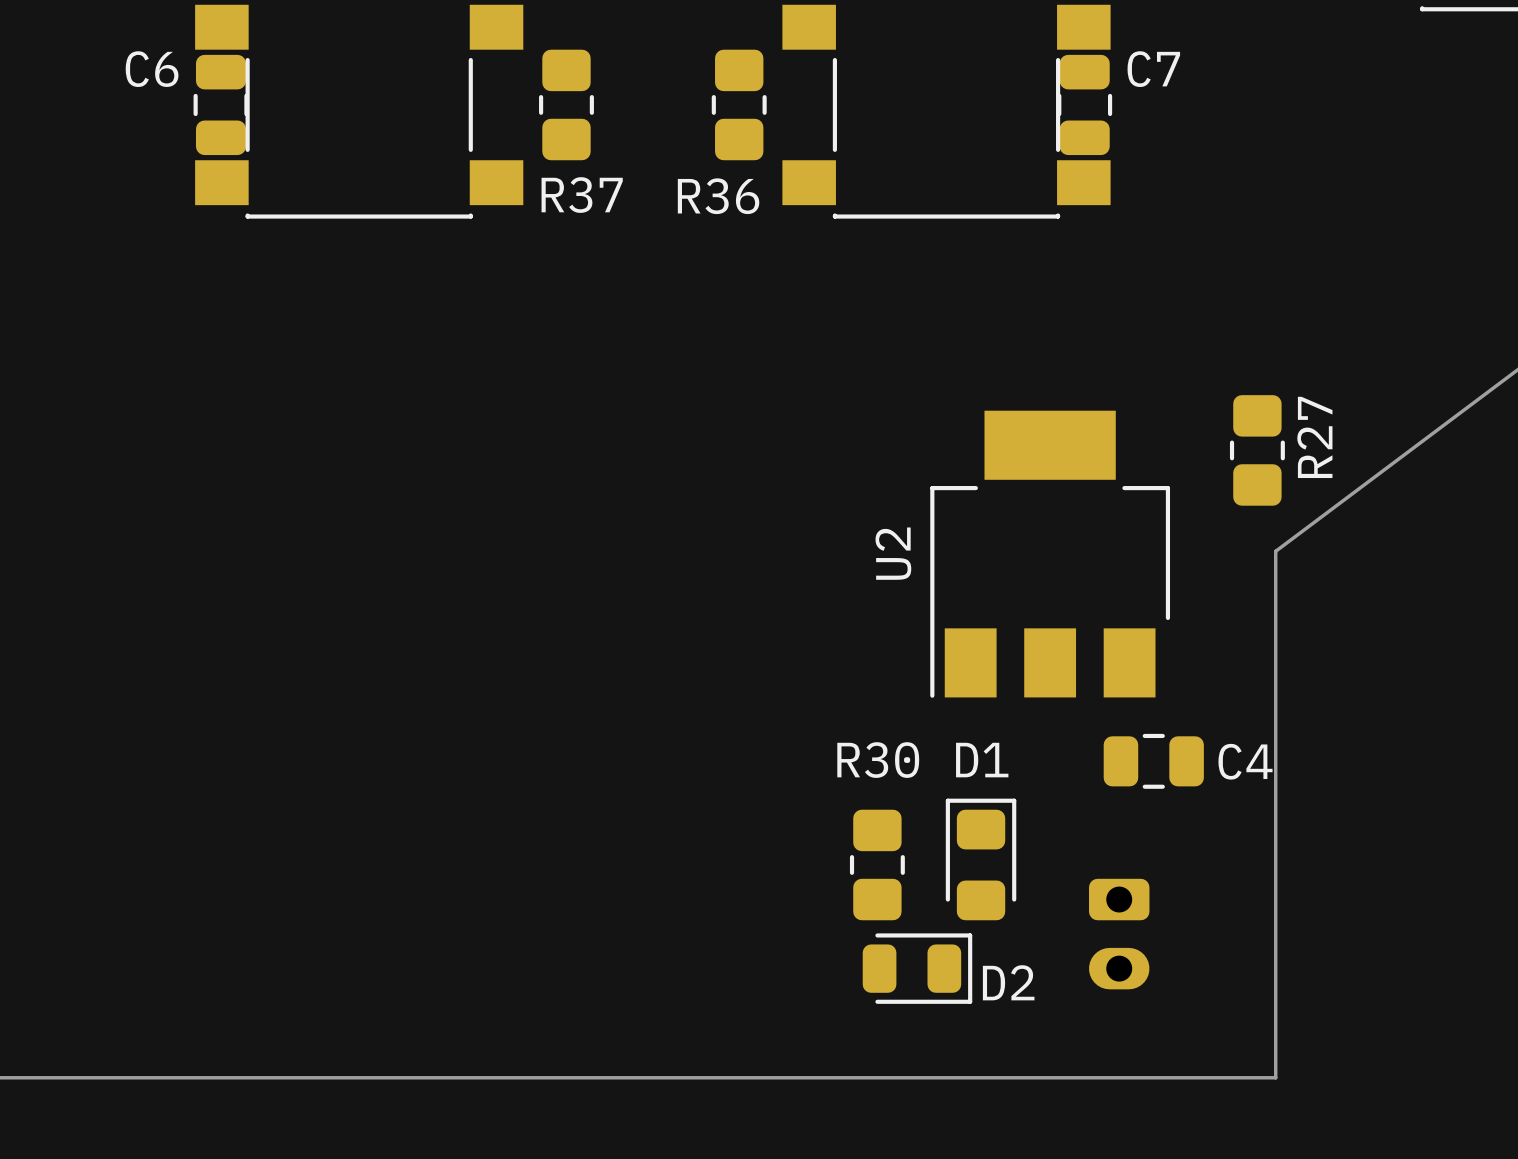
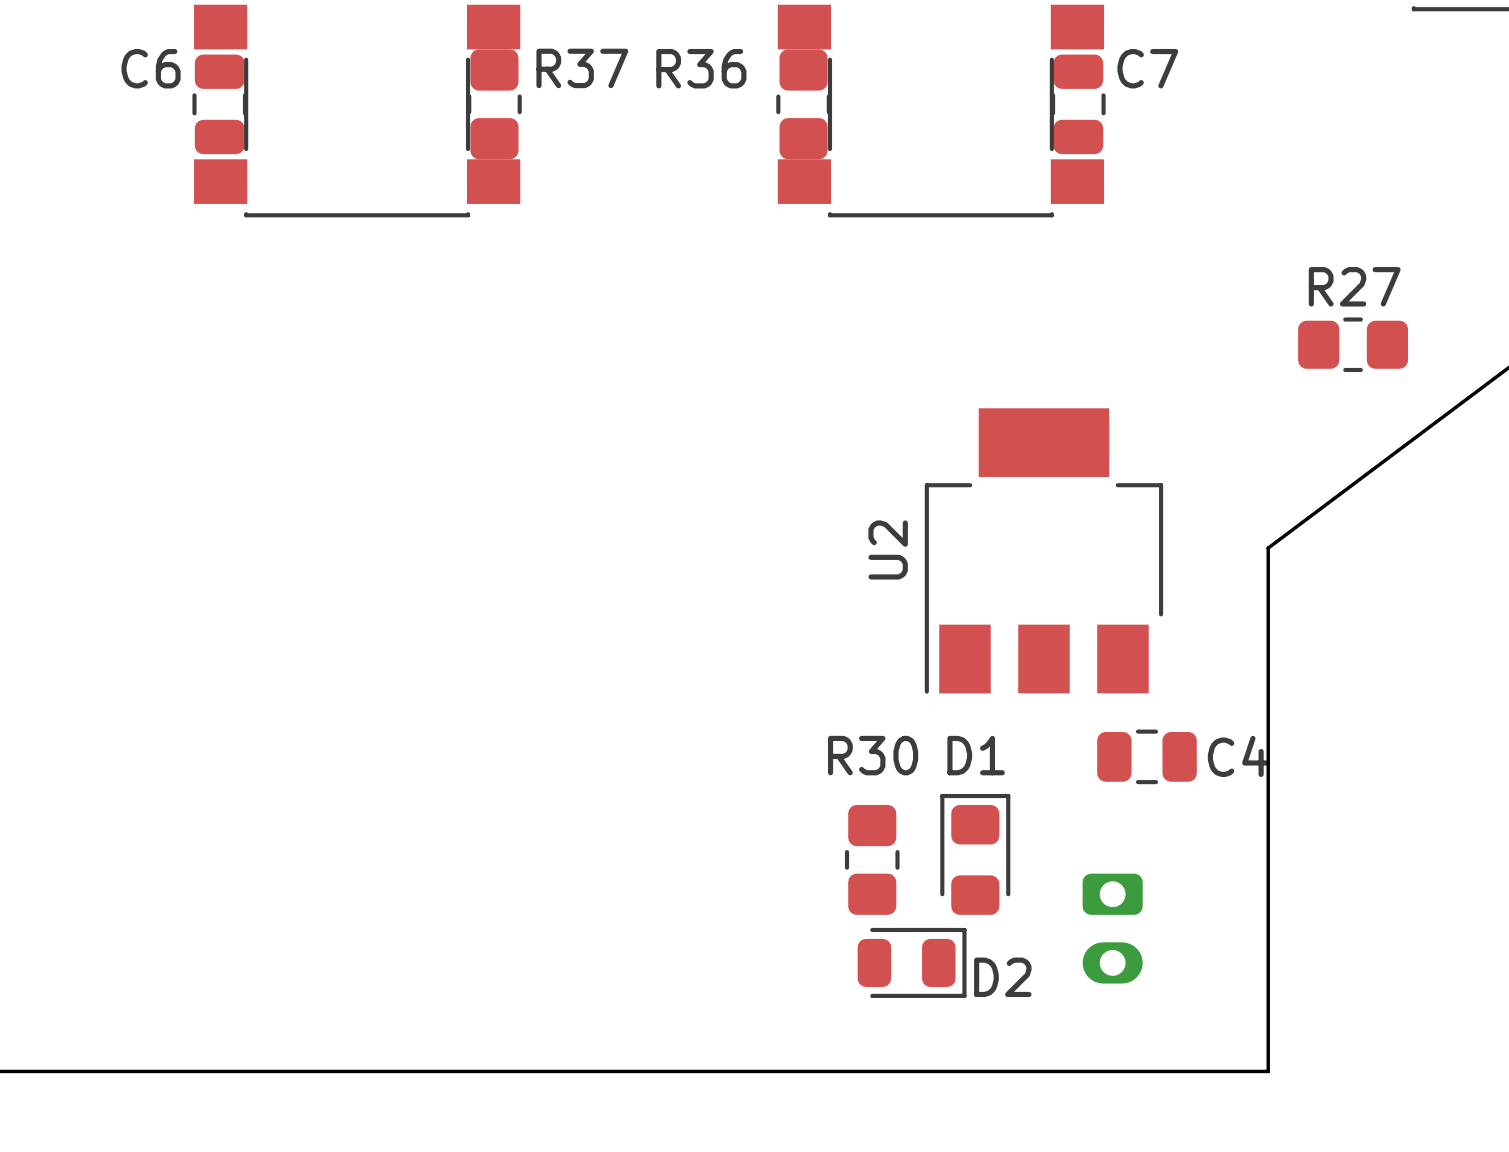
R37 position: (566, 104) -> (494, 104)
R36 position: (739, 104) -> (803, 104)
R37 name position: R37 (582, 195) -> R37 (582, 68)
R36 name position: R36 (718, 196) -> R36 (701, 68)
R27 name position: R27 (1314, 437) -> R27 (1354, 286)
R27 rotation: 0° (1257, 450) -> 90° clockwise (1353, 344)
R27 position: (1257, 450) -> (1353, 344)

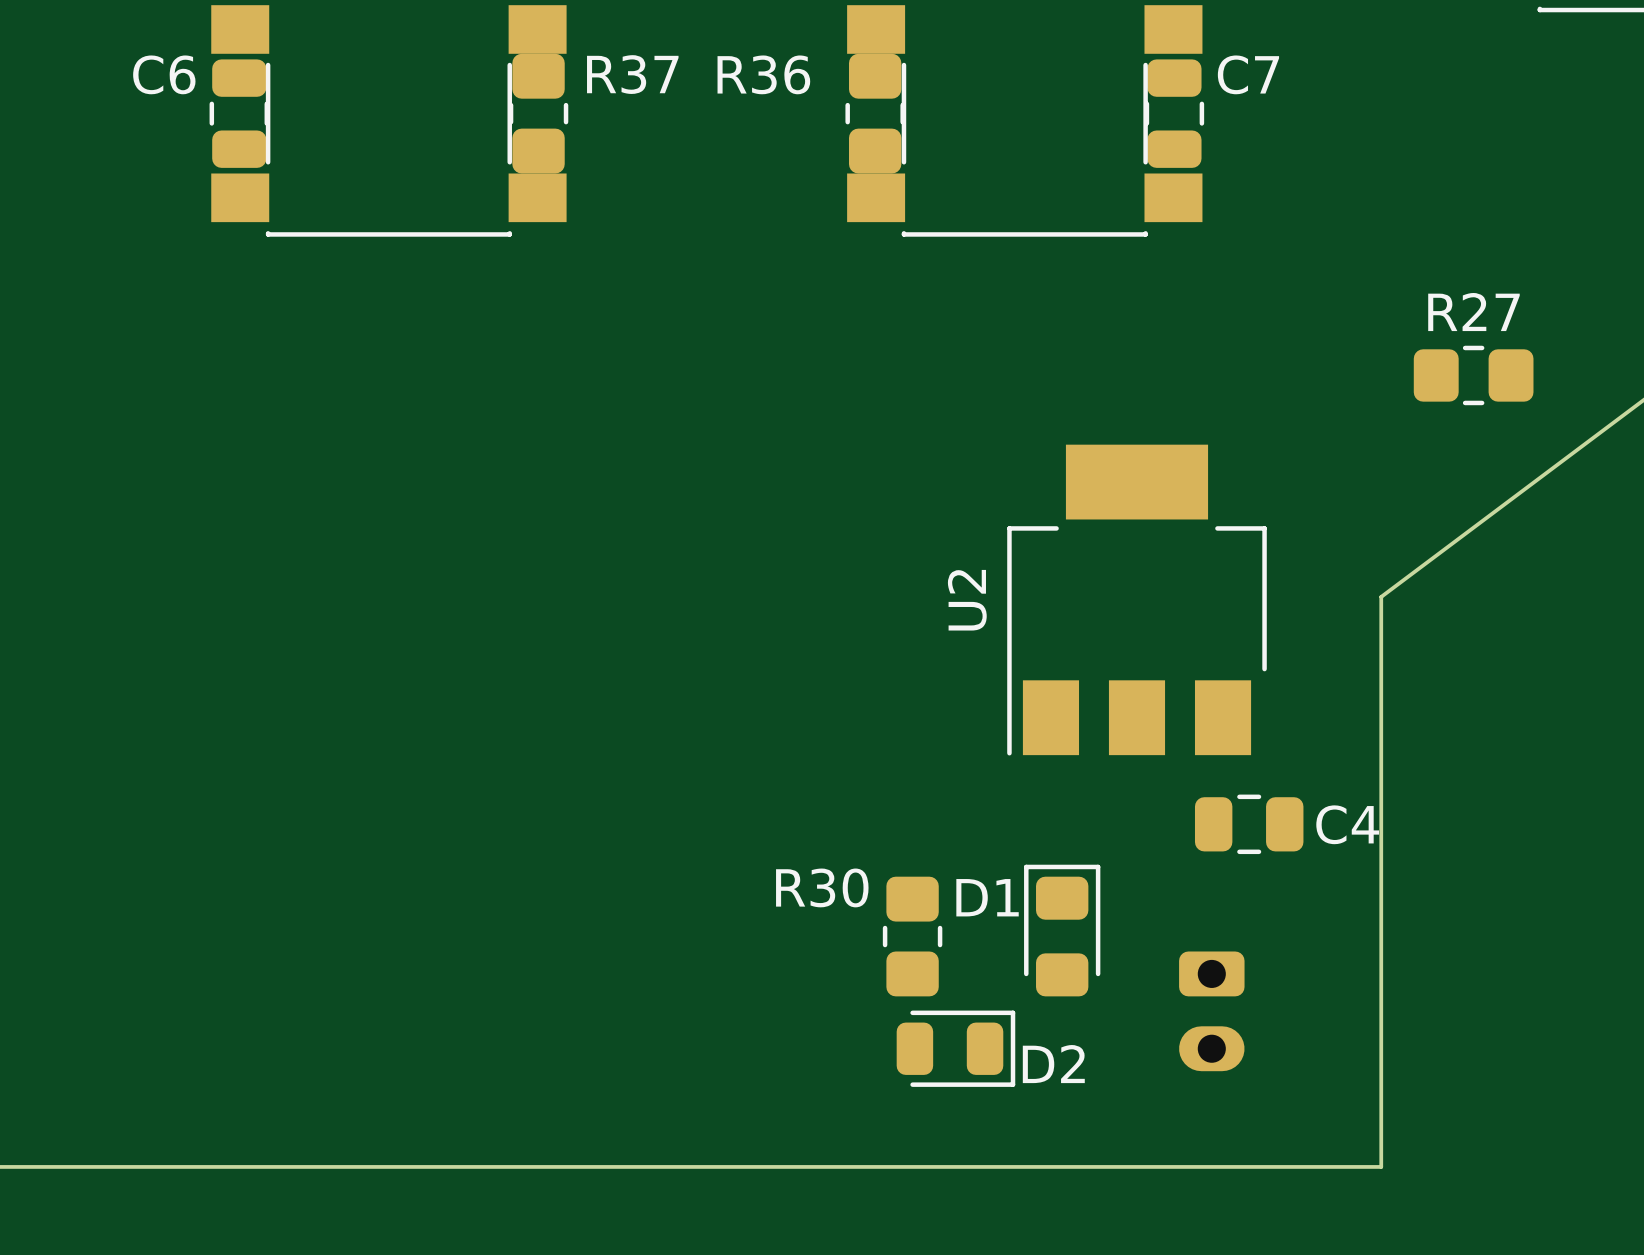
R30 name position: R30 (873, 755) -> R30 (822, 887)
D1 name position: D1 (976, 755) -> D1 (987, 897)
R30 position: (872, 859) -> (912, 936)
D2 position: (912, 962) -> (955, 1048)

